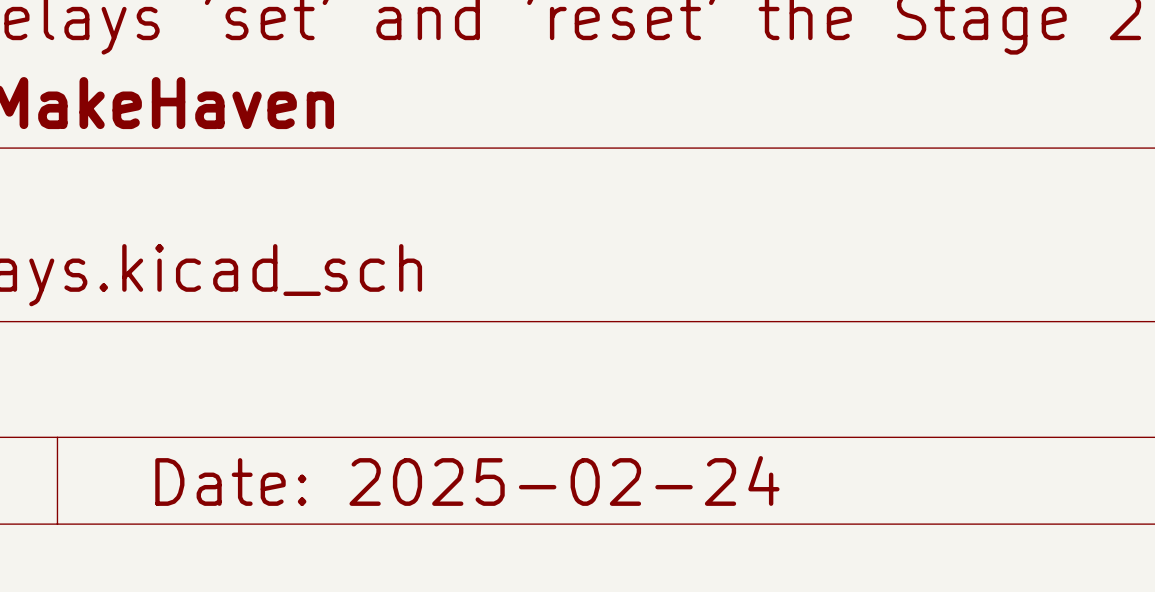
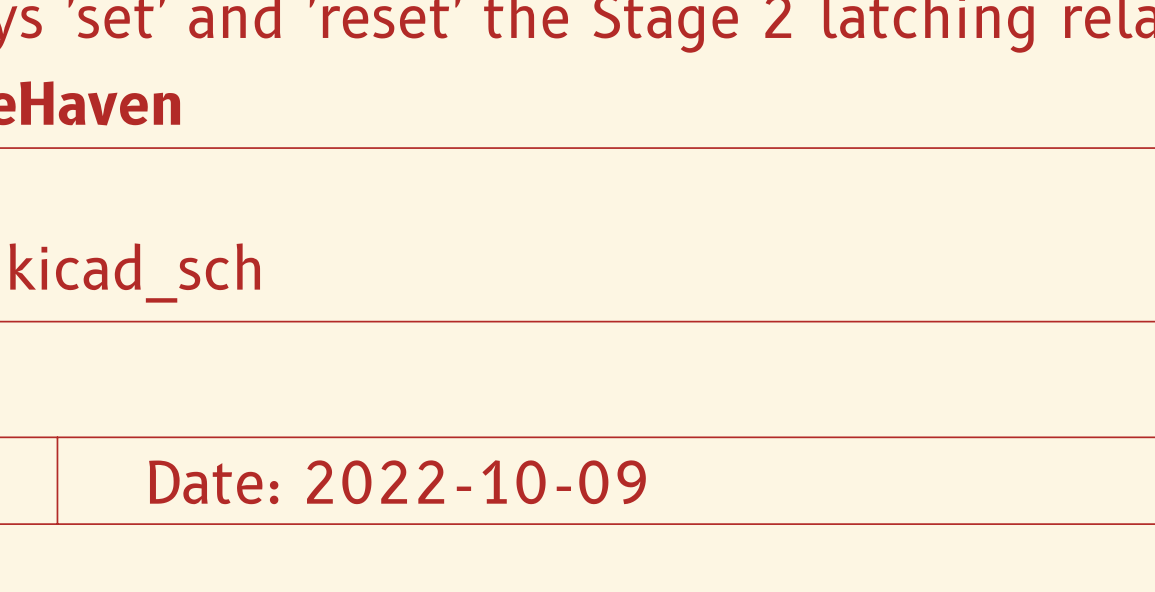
title block: Date: 2025-02-24 (467, 480) -> Date: 2022-10-09 (397, 482)

